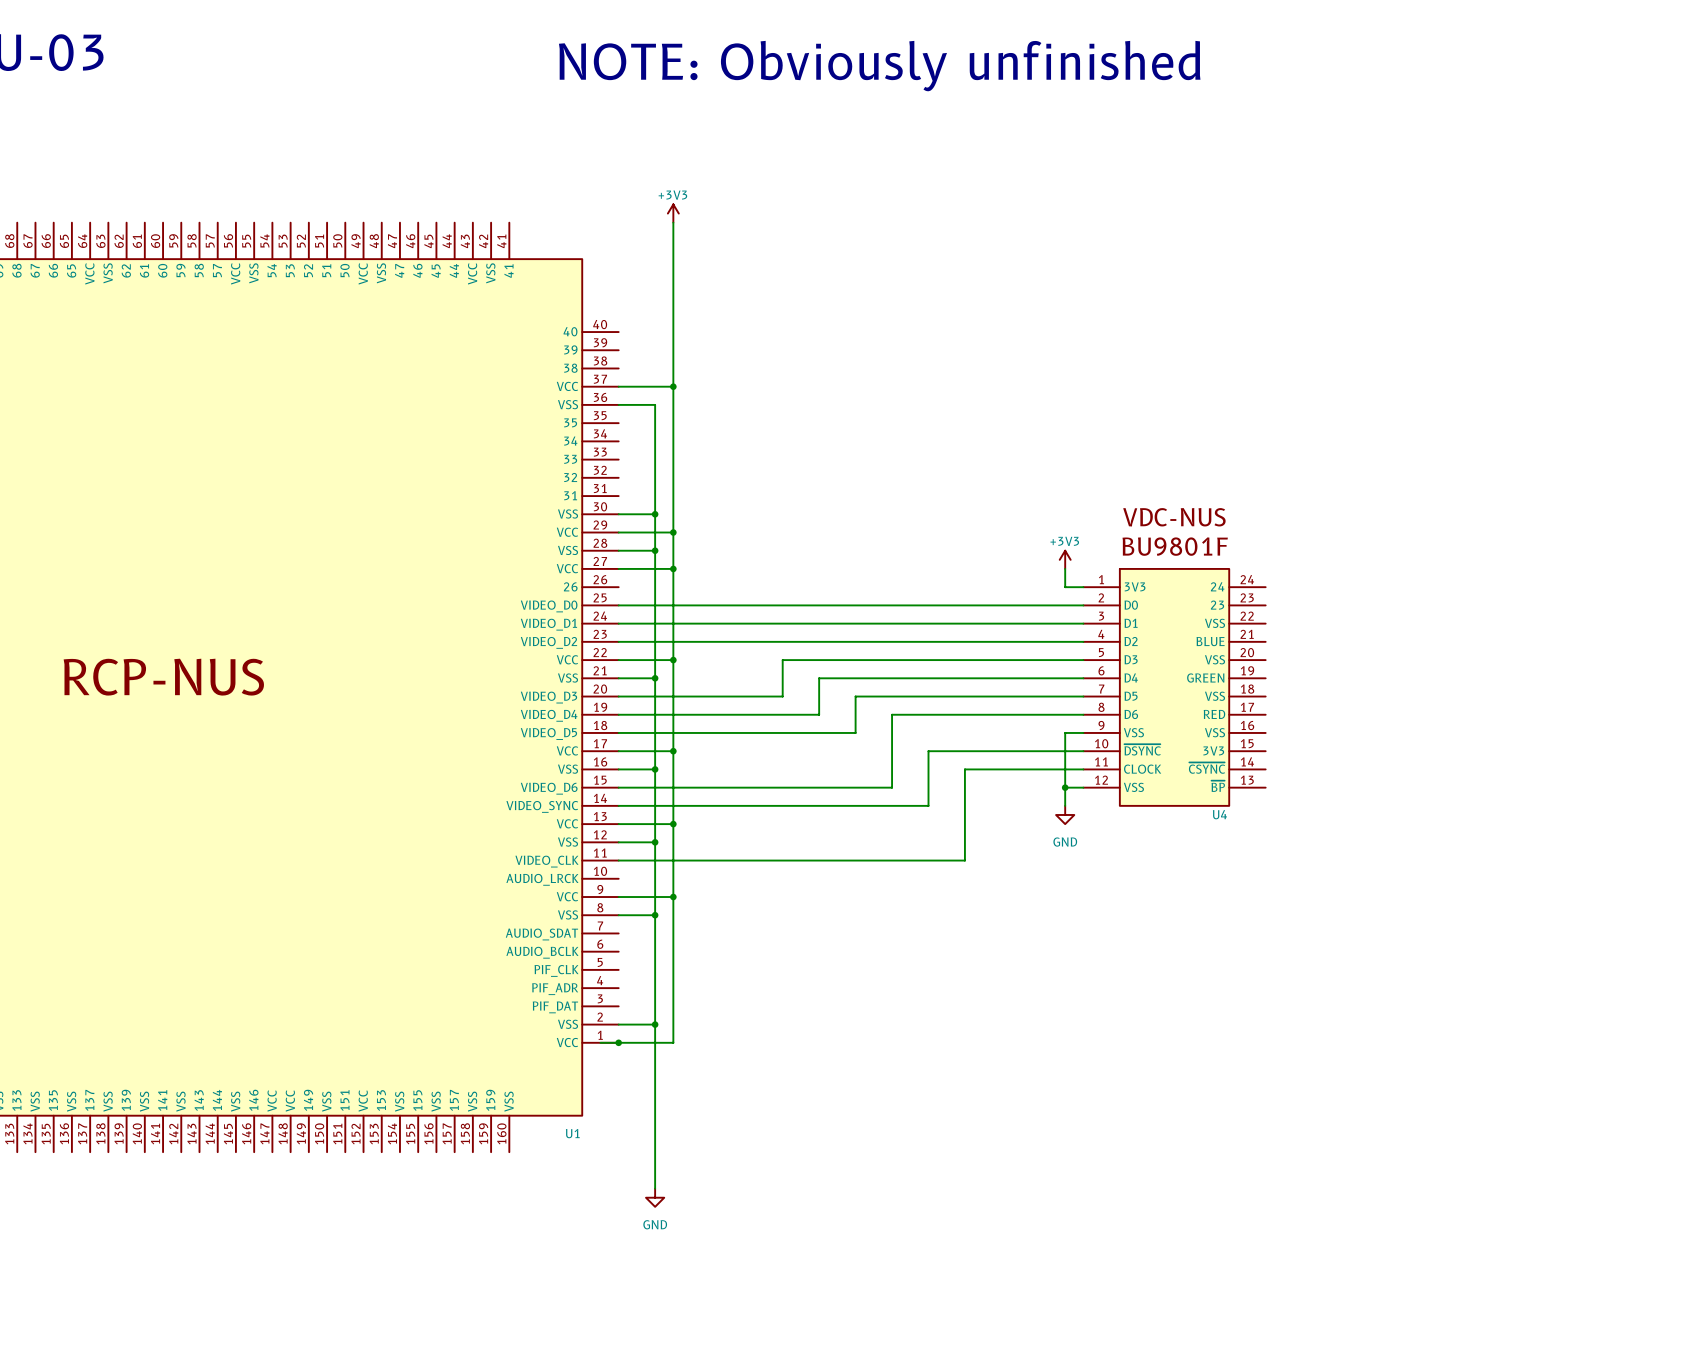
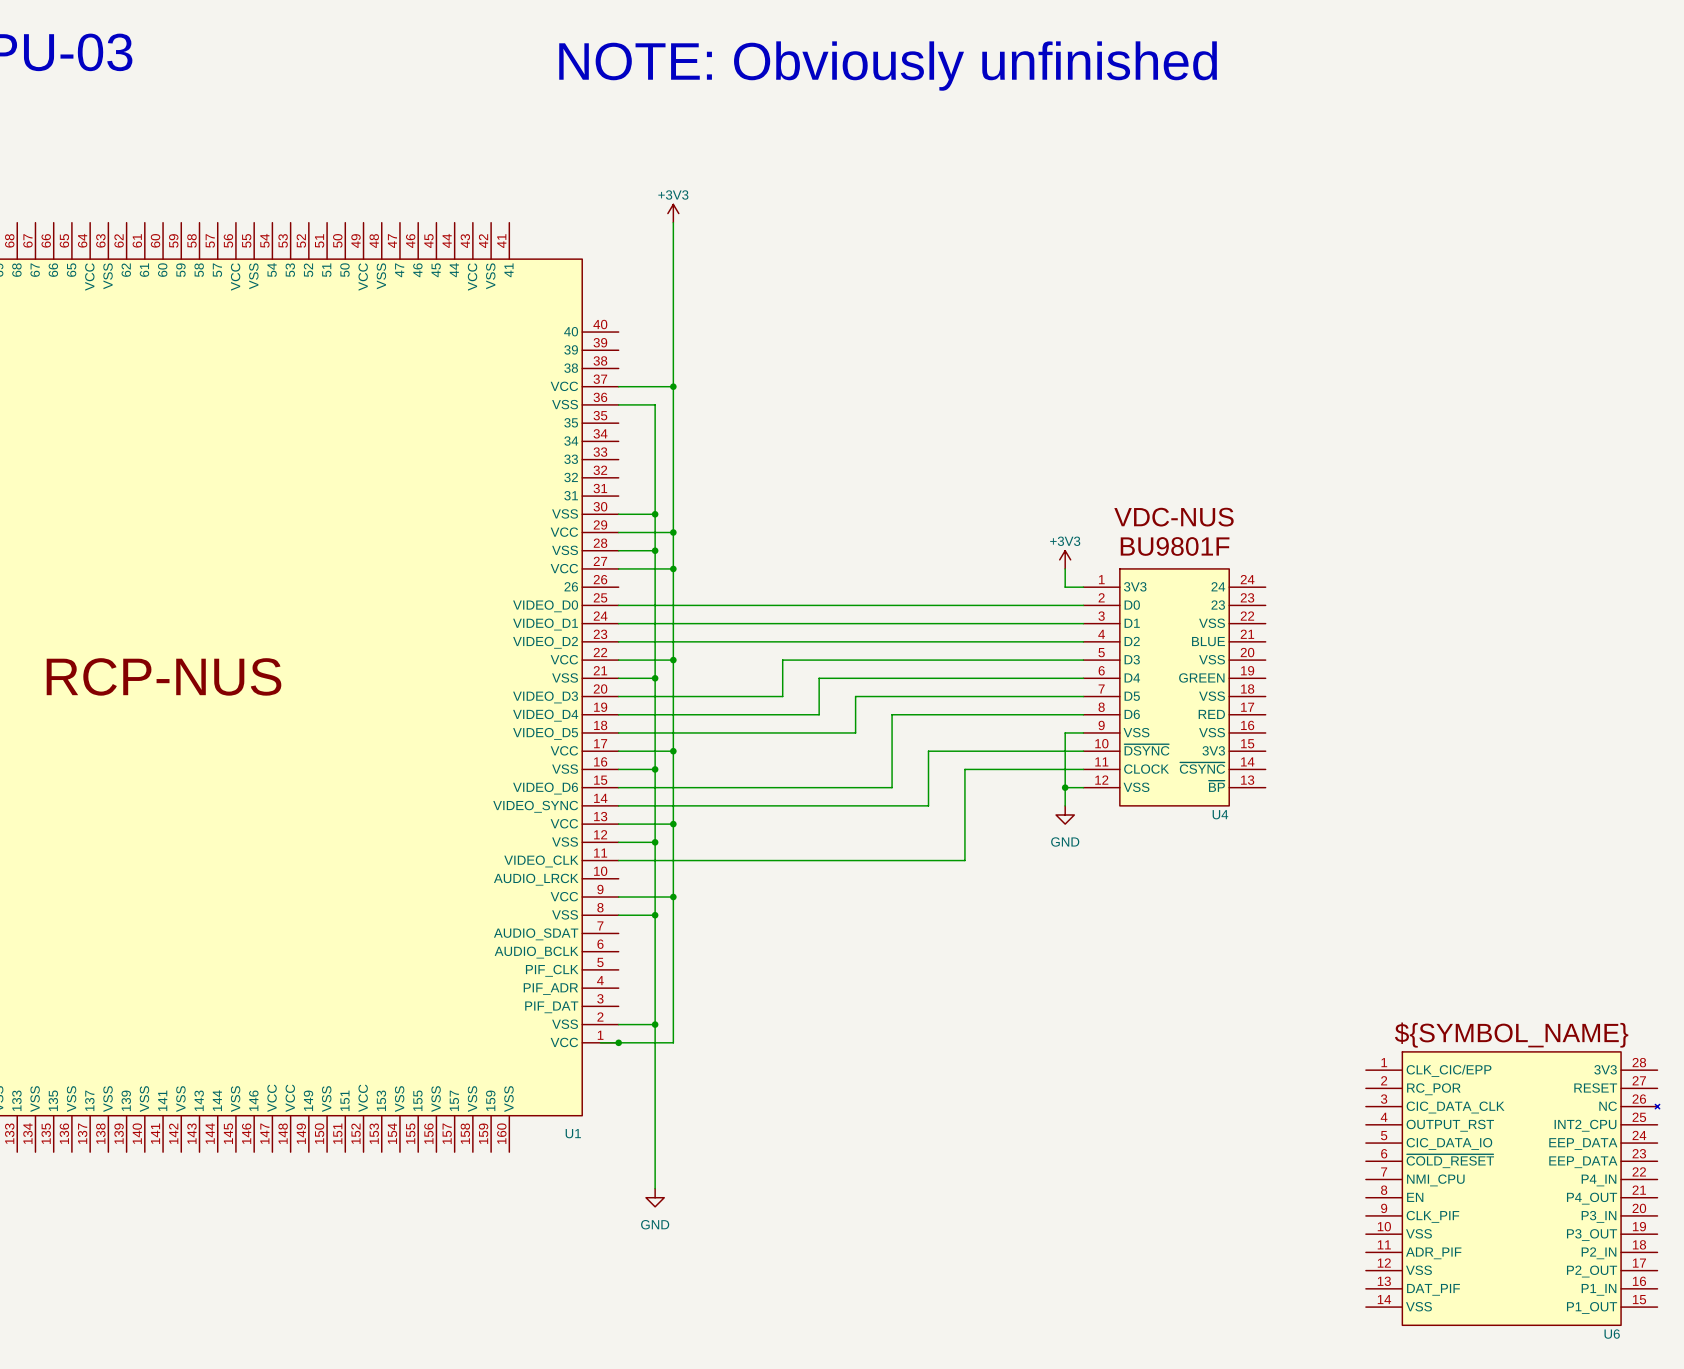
U6: none -> (1512, 1188)

